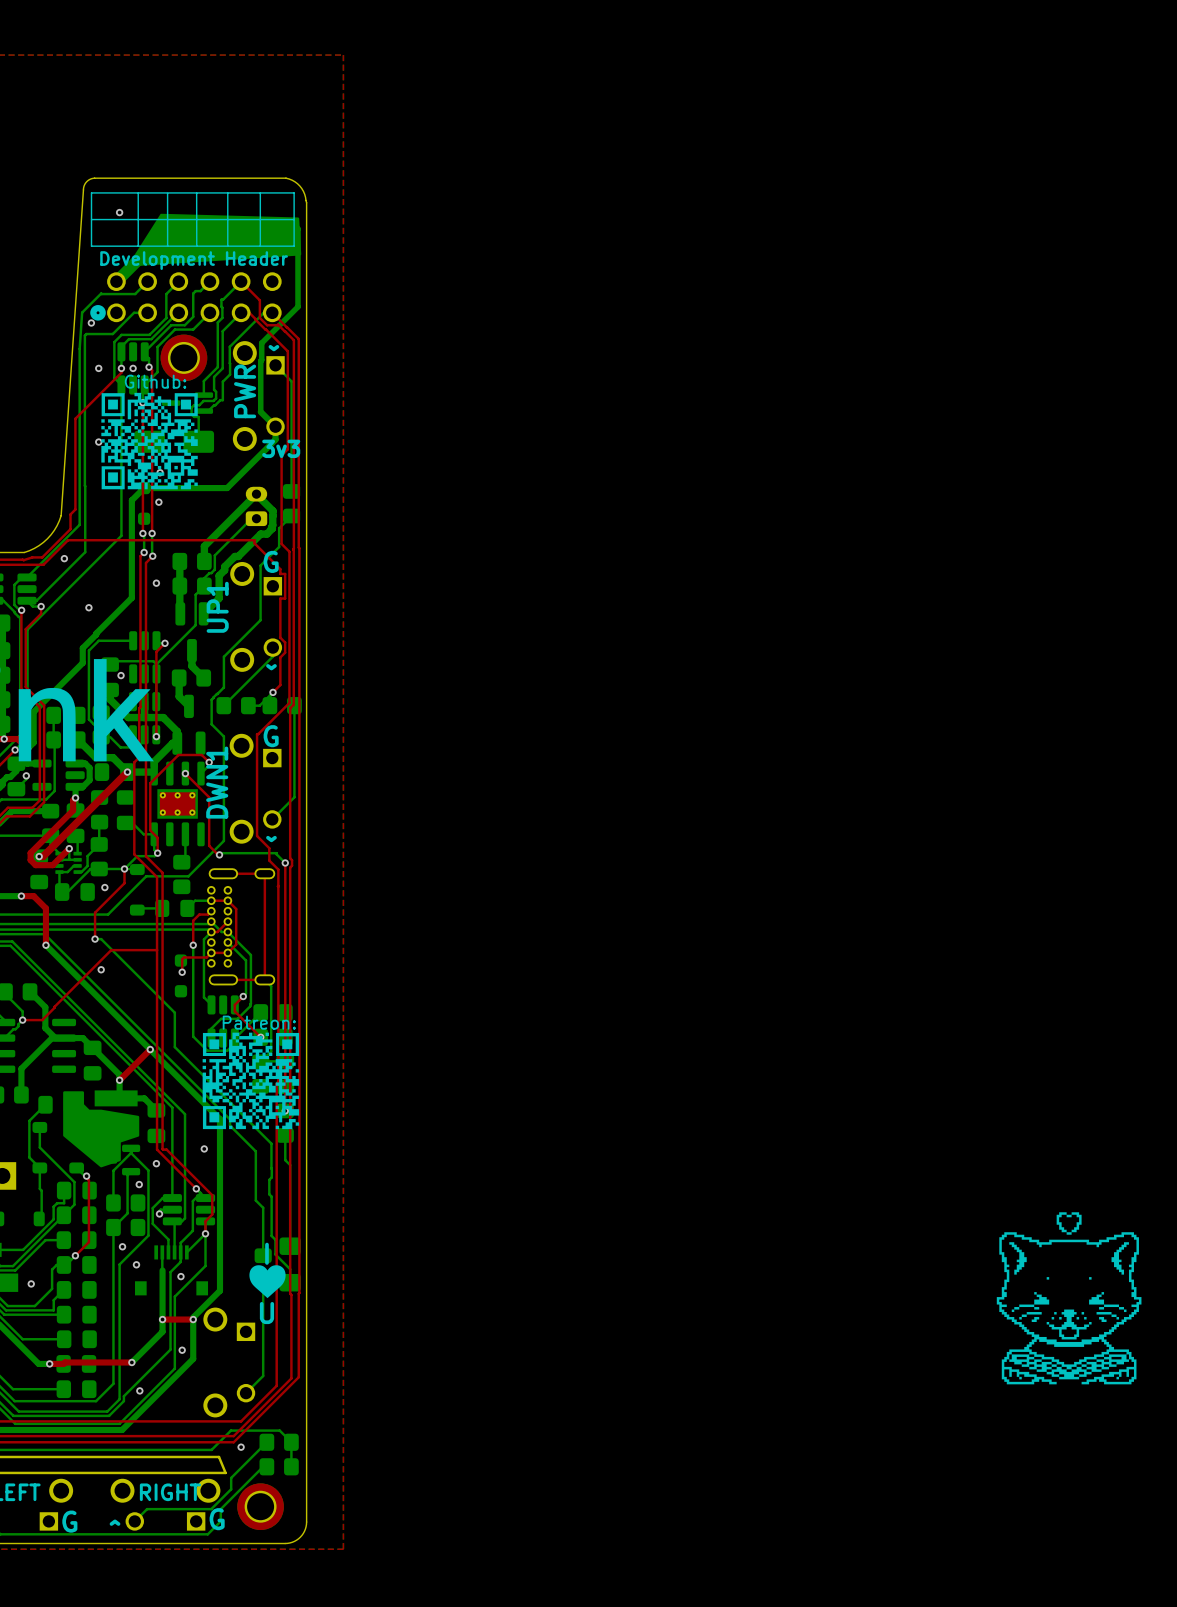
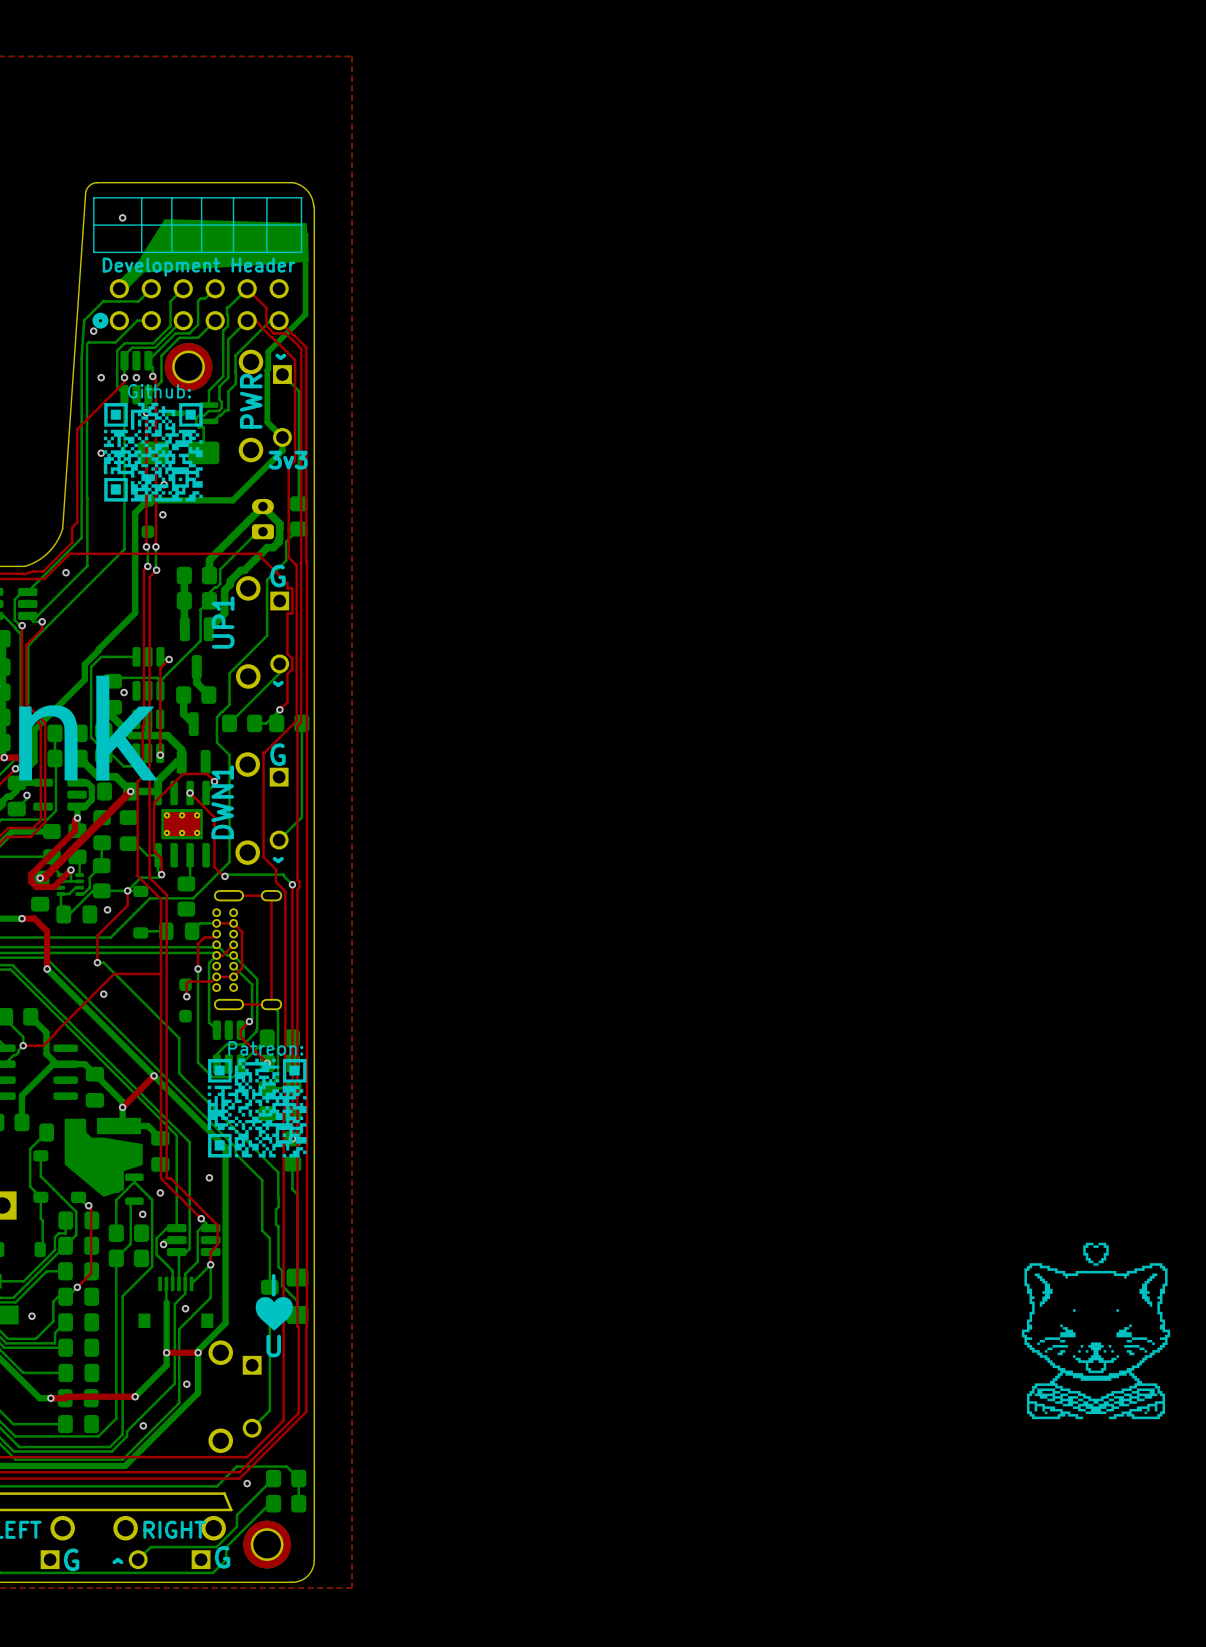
via: (156, 583) -> none
via: (88, 607) -> none
via: (122, 1246) -> none
via: (136, 1264) -> none

